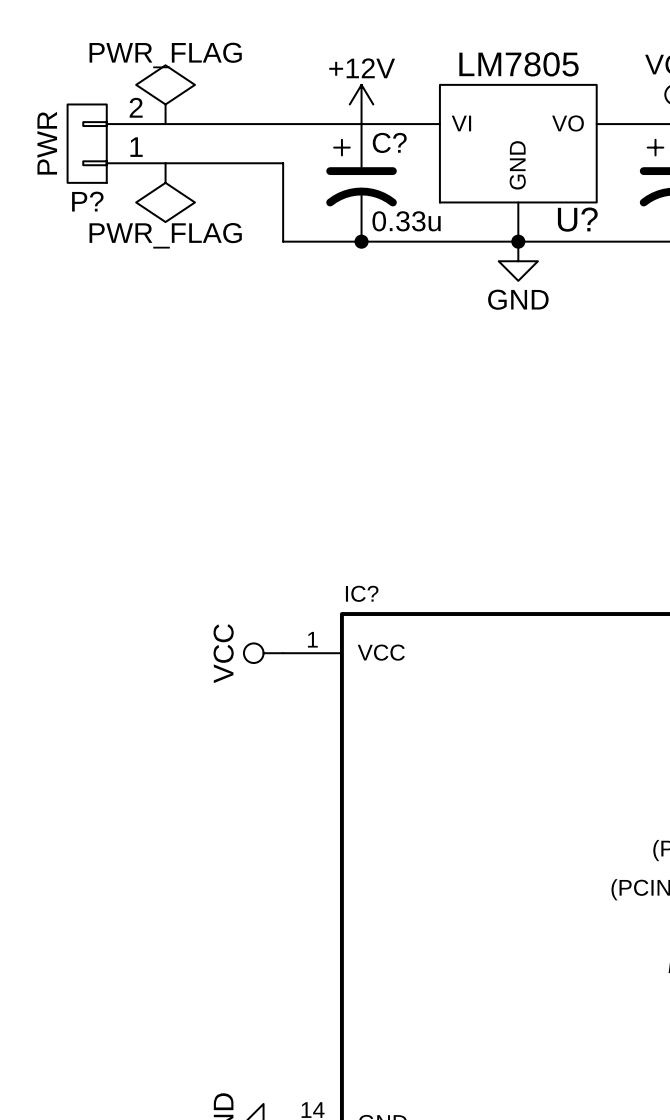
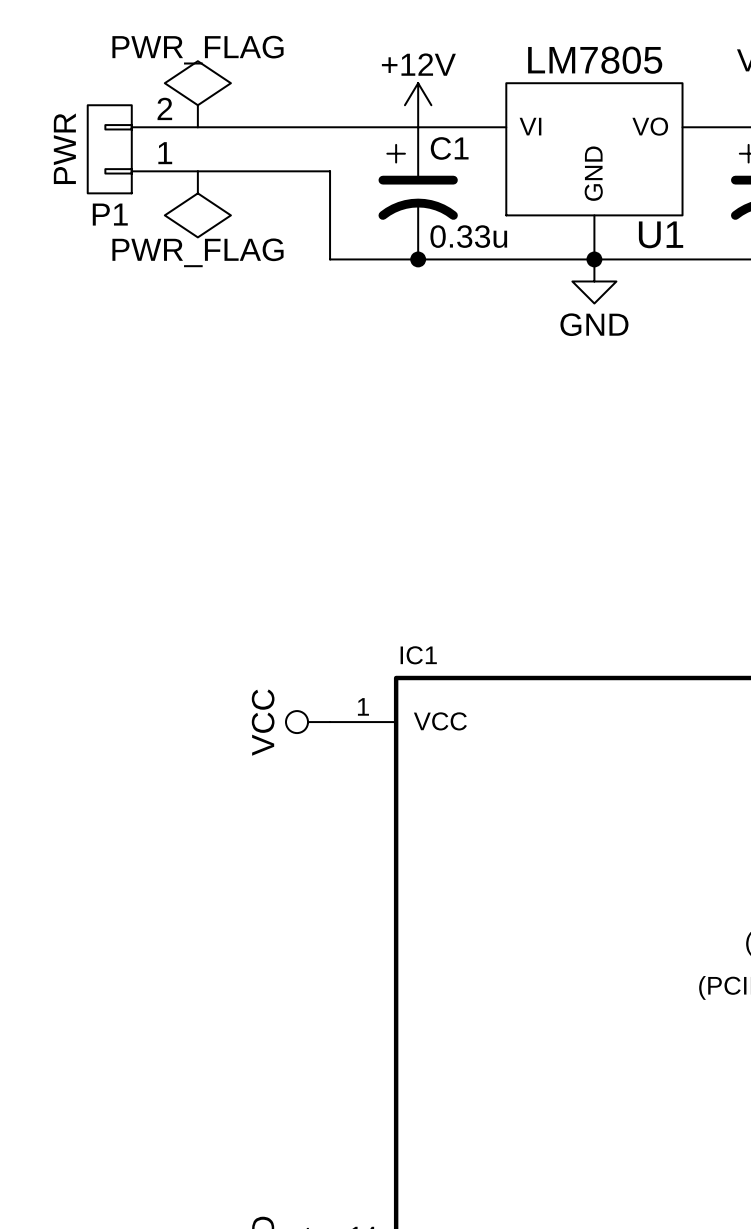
C? name: C? (389, 142) -> C1 (449, 148)
P? name: P? (87, 201) -> P1 (110, 214)
U? name: U? (577, 219) -> U1 (661, 234)
IC? name: IC? (362, 593) -> IC1 (418, 655)

